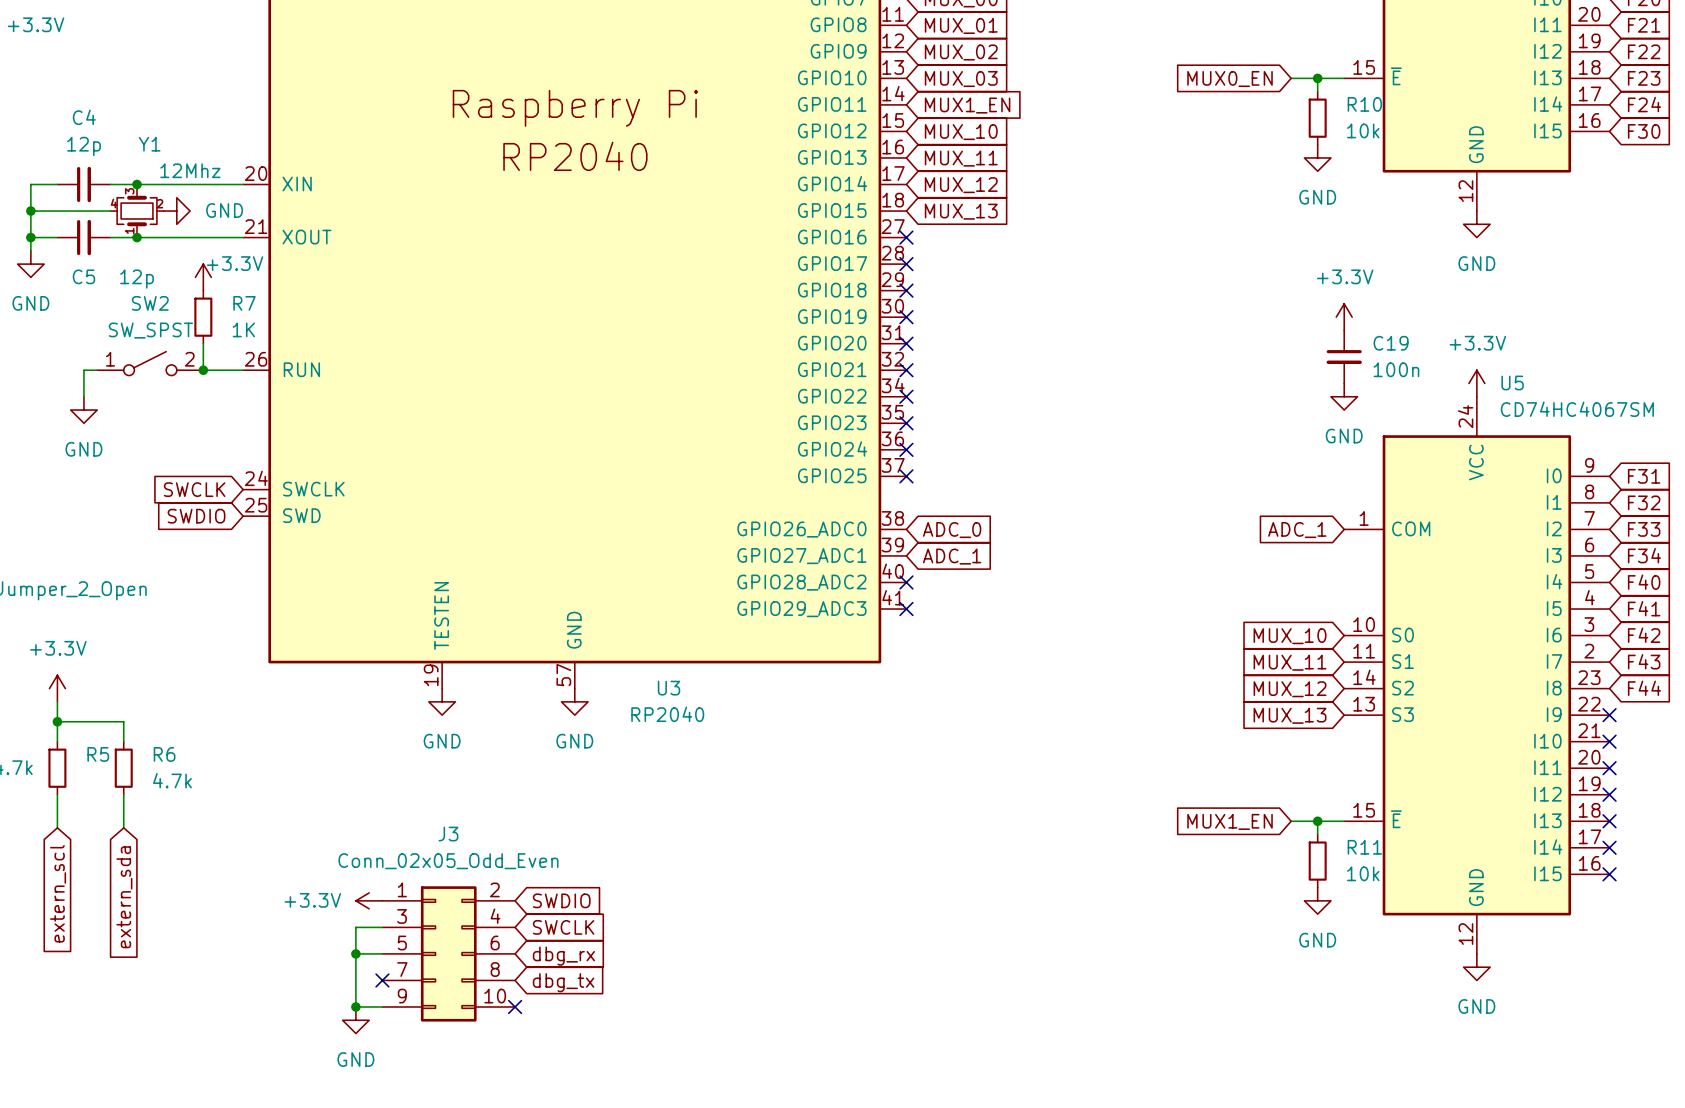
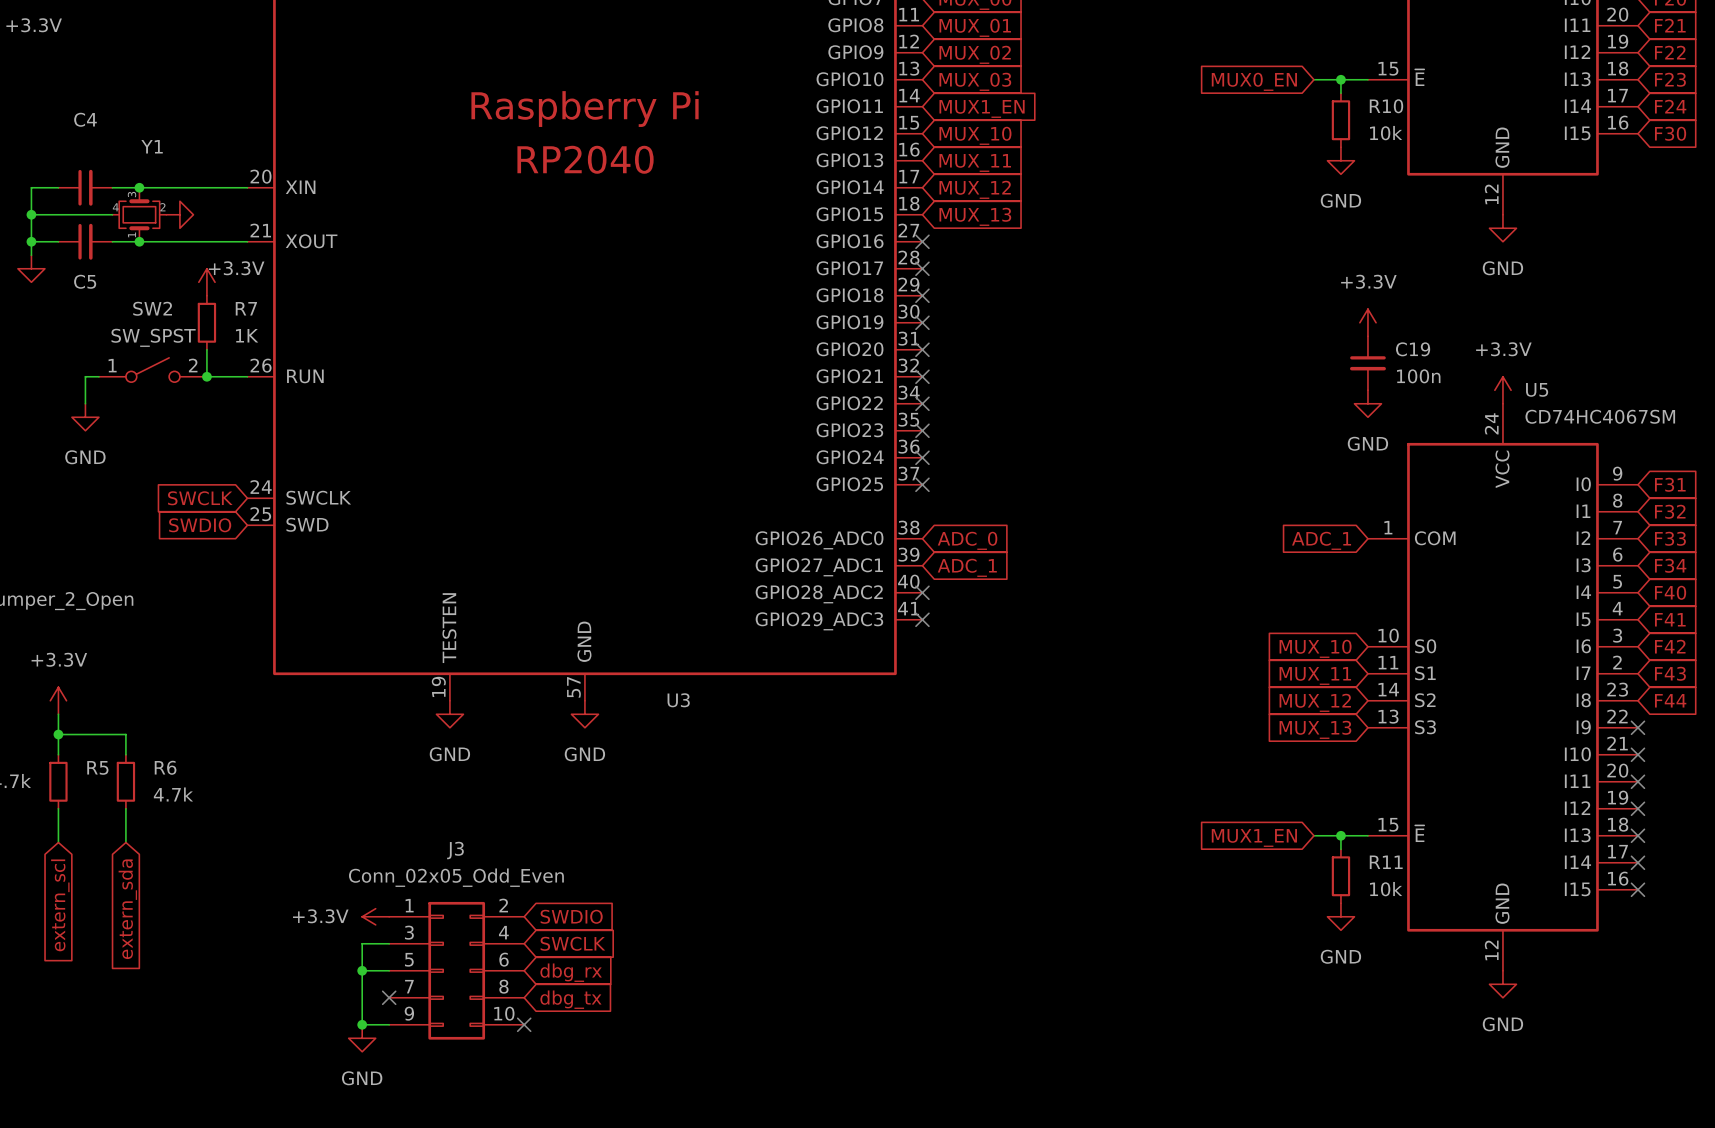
C4 value: 12p (84, 146) -> none
Y1 value: 12Mhz (190, 170) -> none
power symbol text: GND (224, 210) -> none
C5 value: 12p (137, 279) -> none
power symbol text: GND (30, 303) -> none
U3 value: RP2040 (667, 714) -> none

